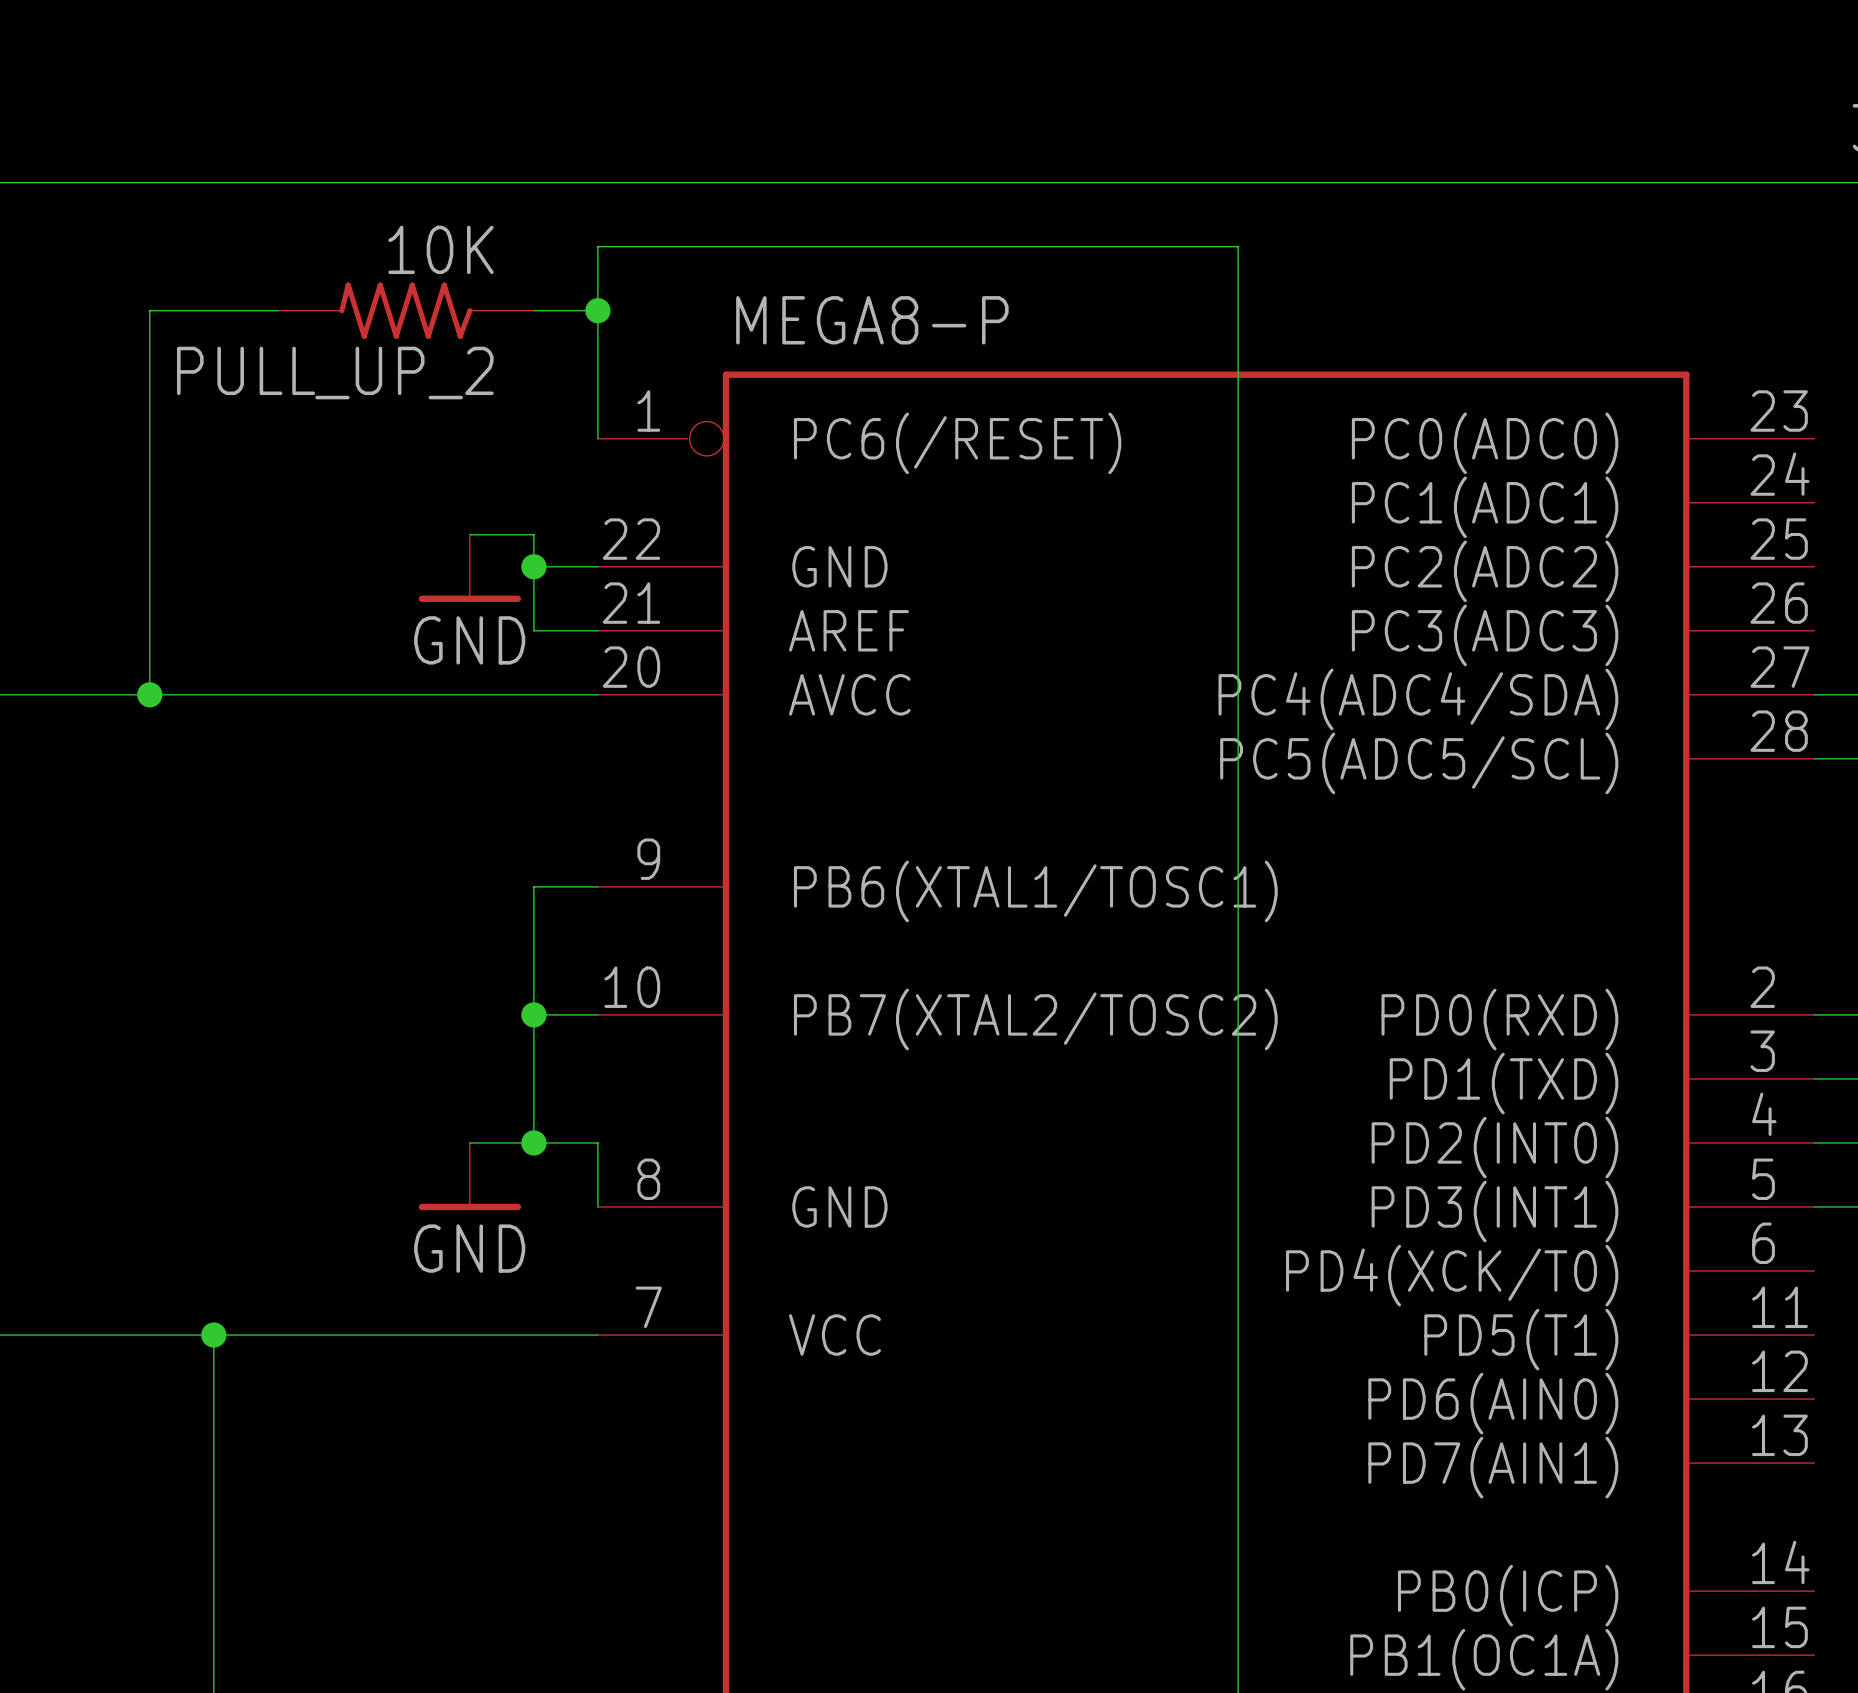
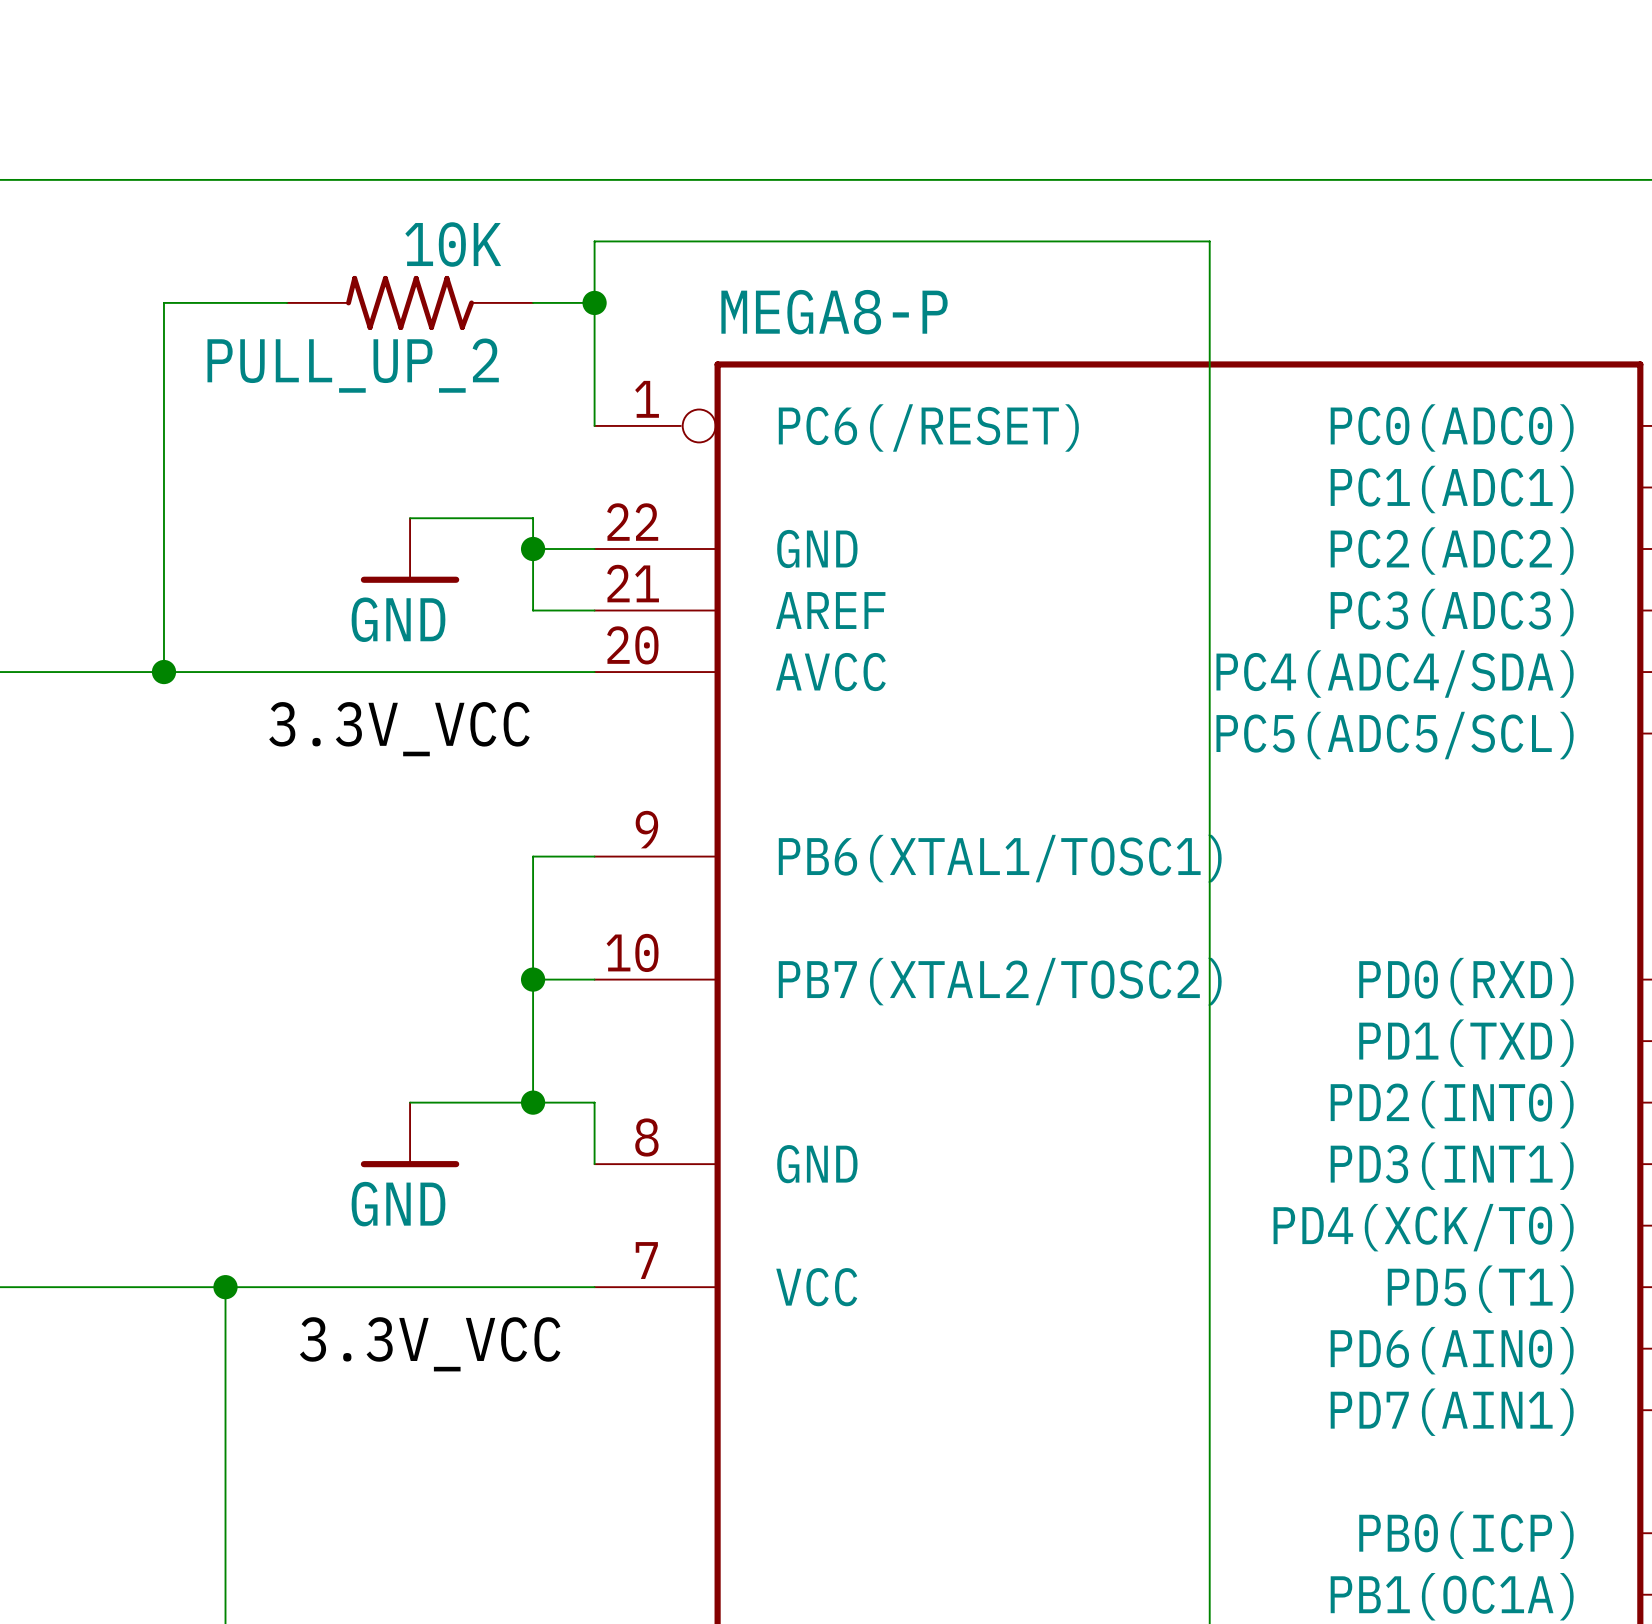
wire: none -> (410, 518) (471, 518)
power symbol position: GND (469, 568) -> GND (410, 550)
label: none -> 3.3V_VCC (399, 729)
wire: none -> (410, 1102) (471, 1102)
power symbol position: GND (469, 1176) -> GND (410, 1134)
label: none -> 3.3V_VCC (430, 1344)

